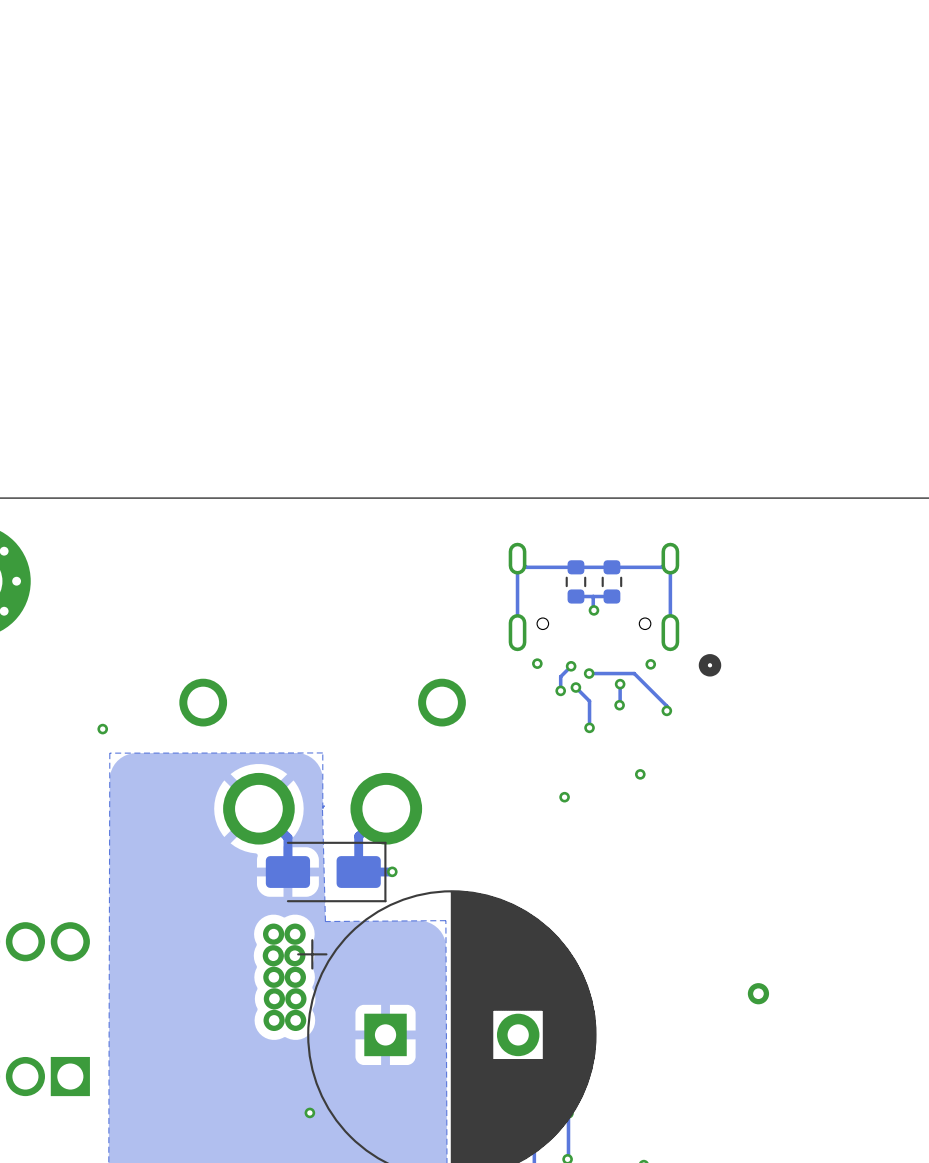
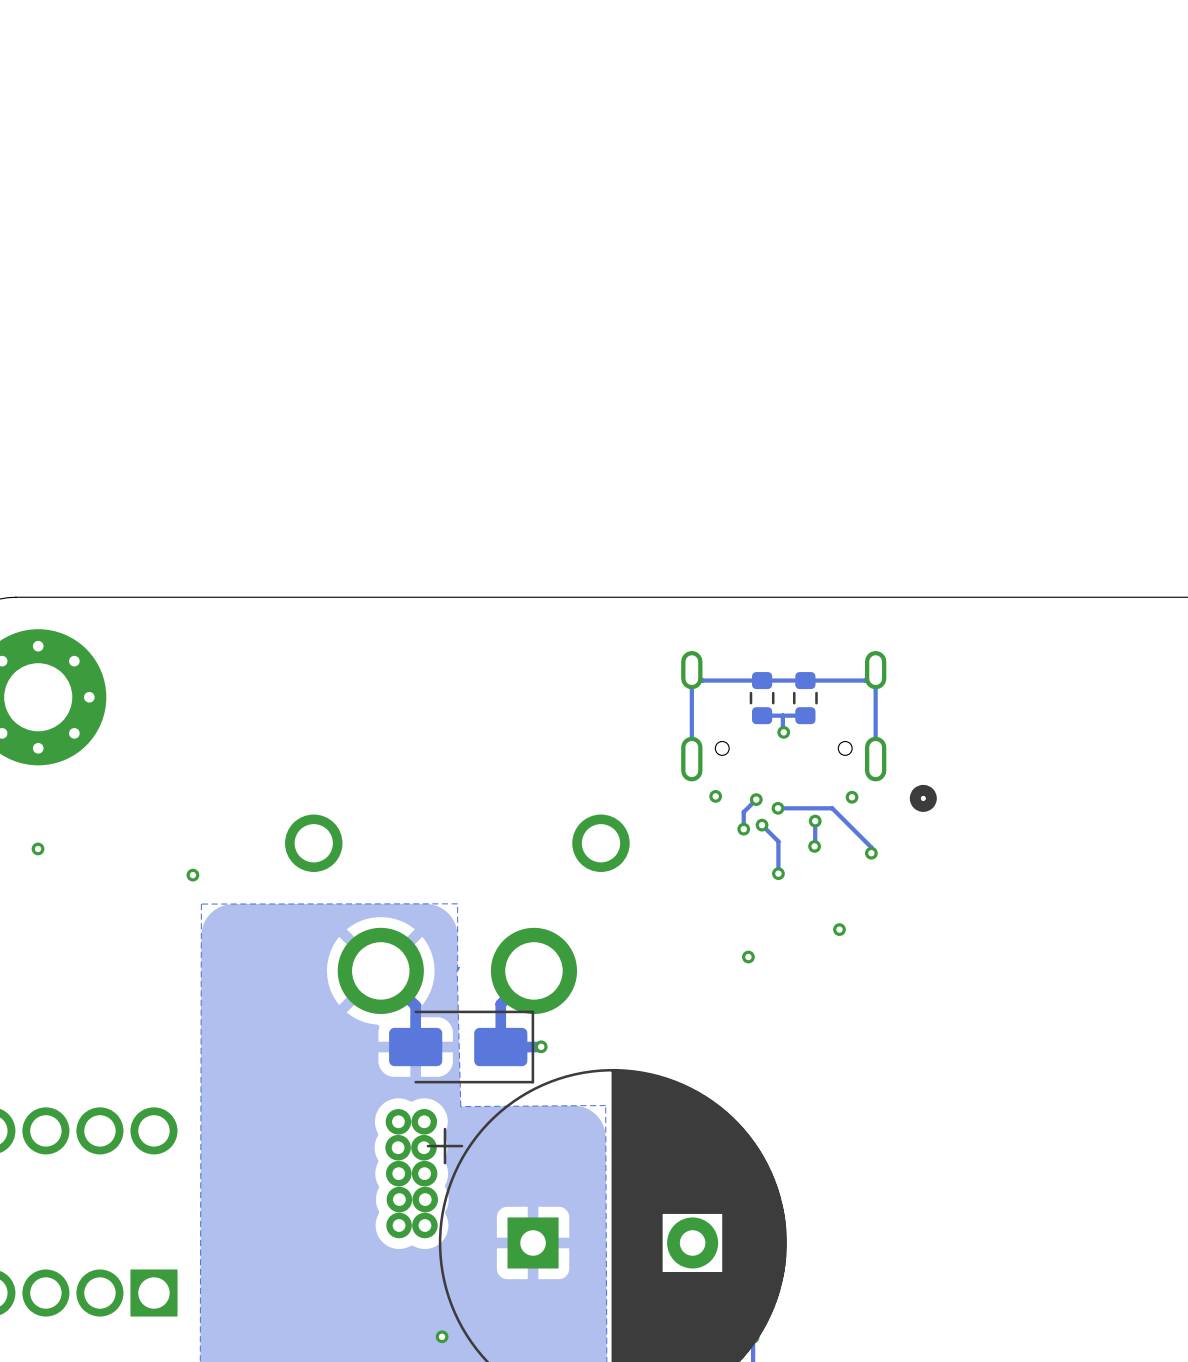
via: (758, 993) -> none

